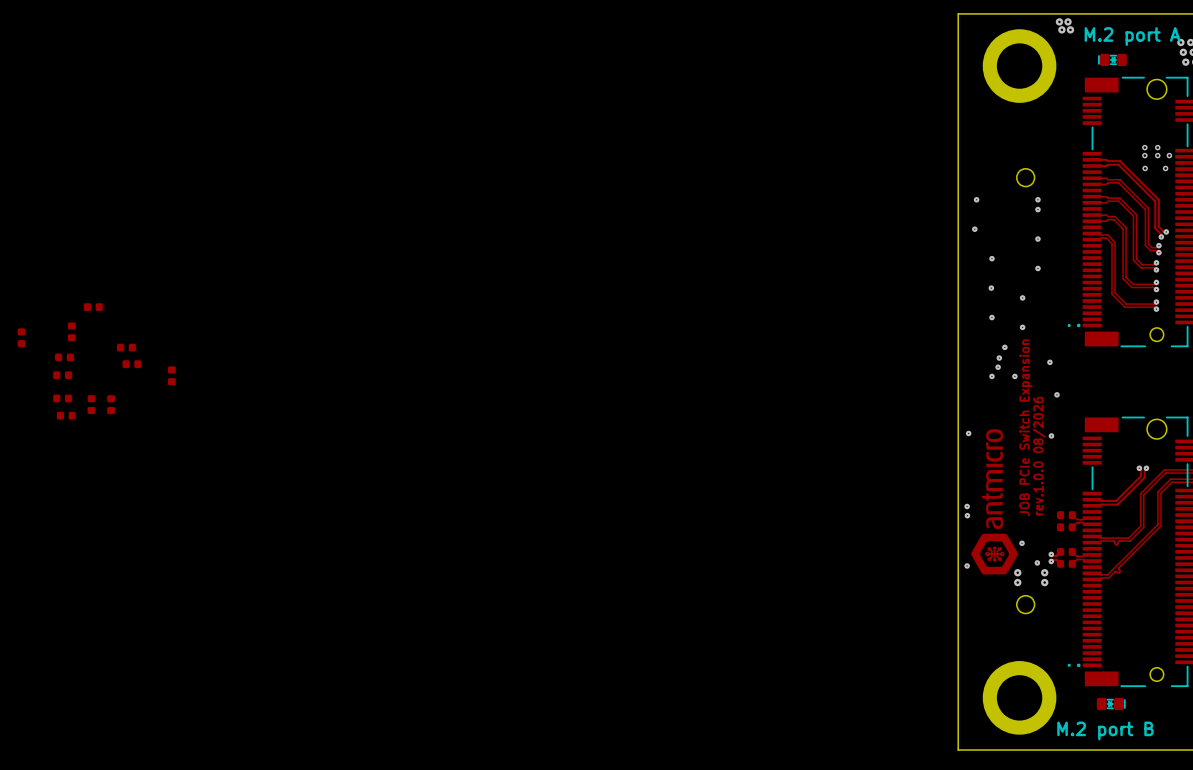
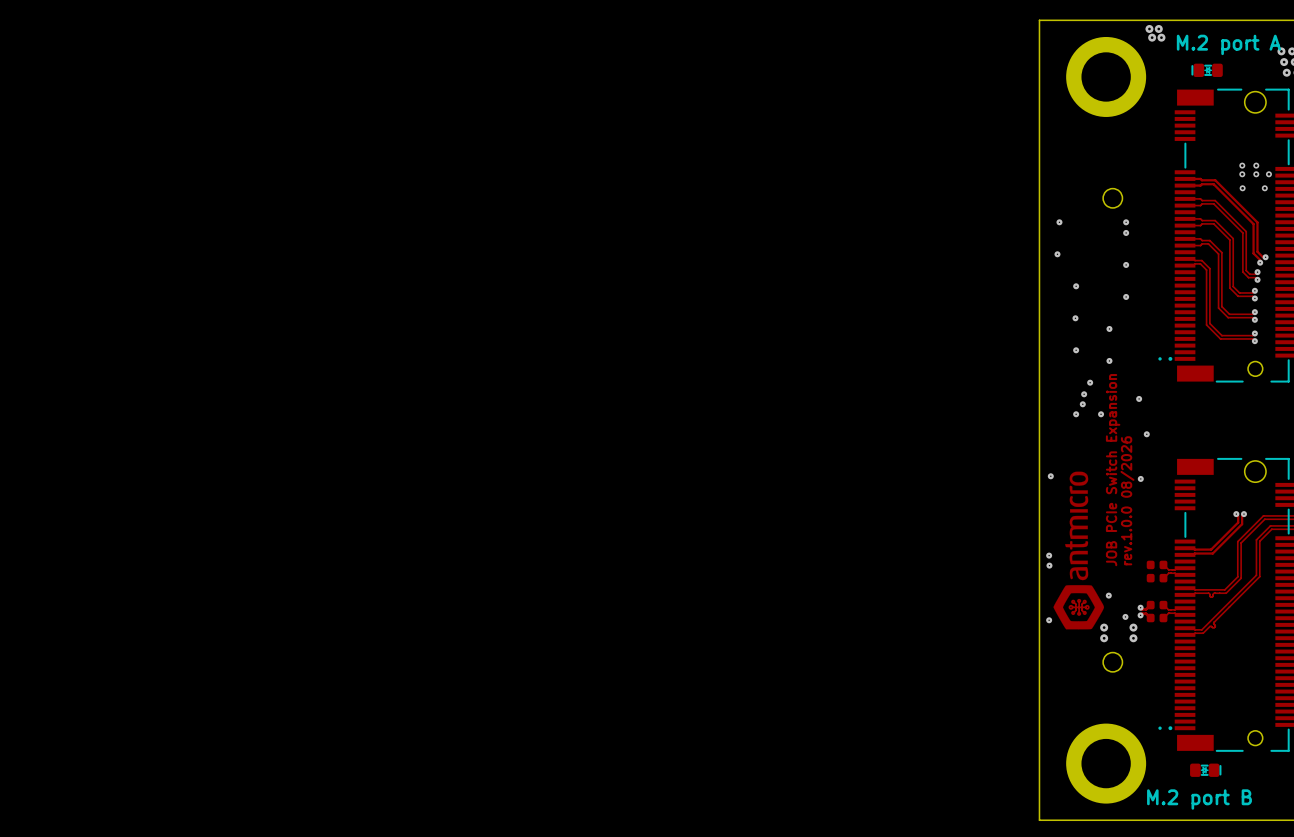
part: (93, 307) -> none
part: (71, 331) -> none
part: (21, 337) -> none
part: (126, 347) -> none
part: (64, 357) -> none
part: (131, 364) -> none
part: (62, 375) -> none
part: (171, 375) -> none
part: (62, 398) -> none
part: (91, 404) -> none
part: (111, 404) -> none
part: (66, 415) -> none

